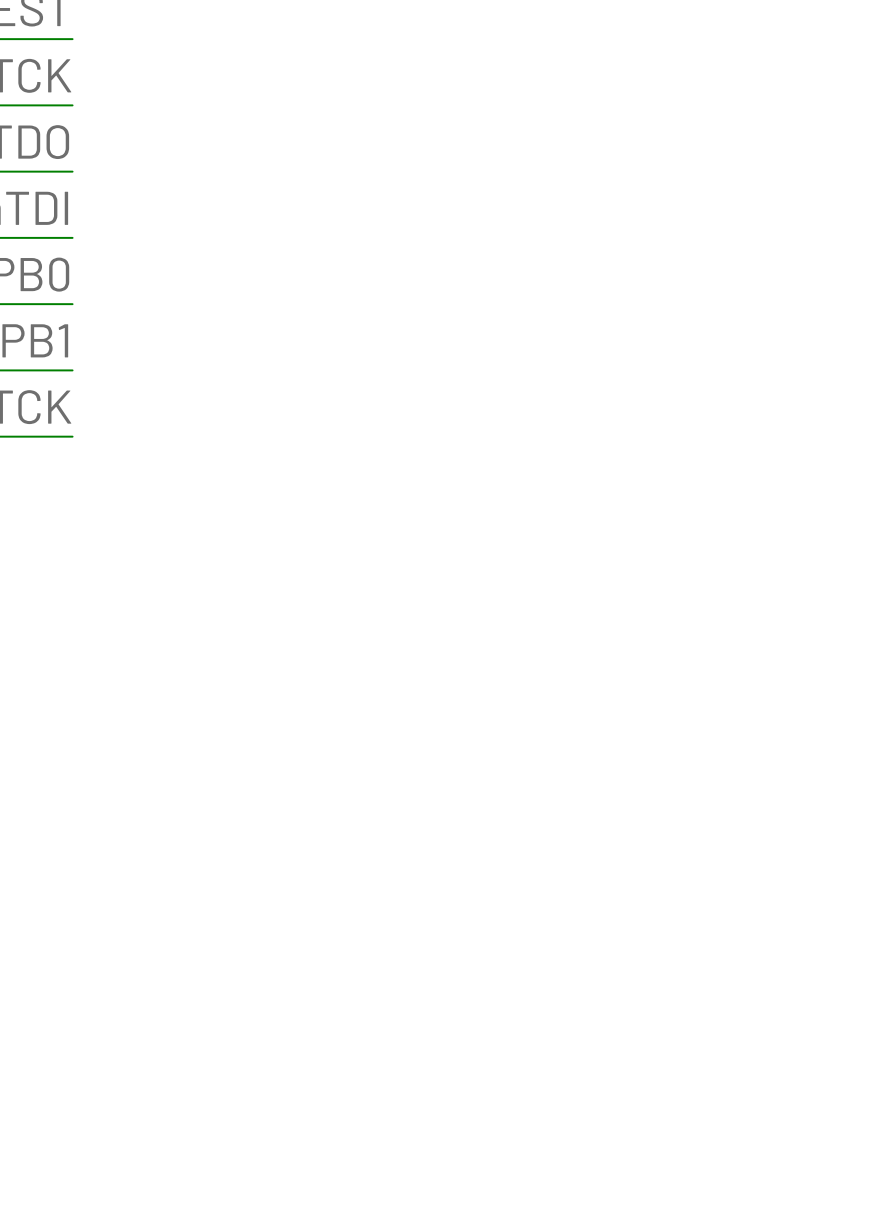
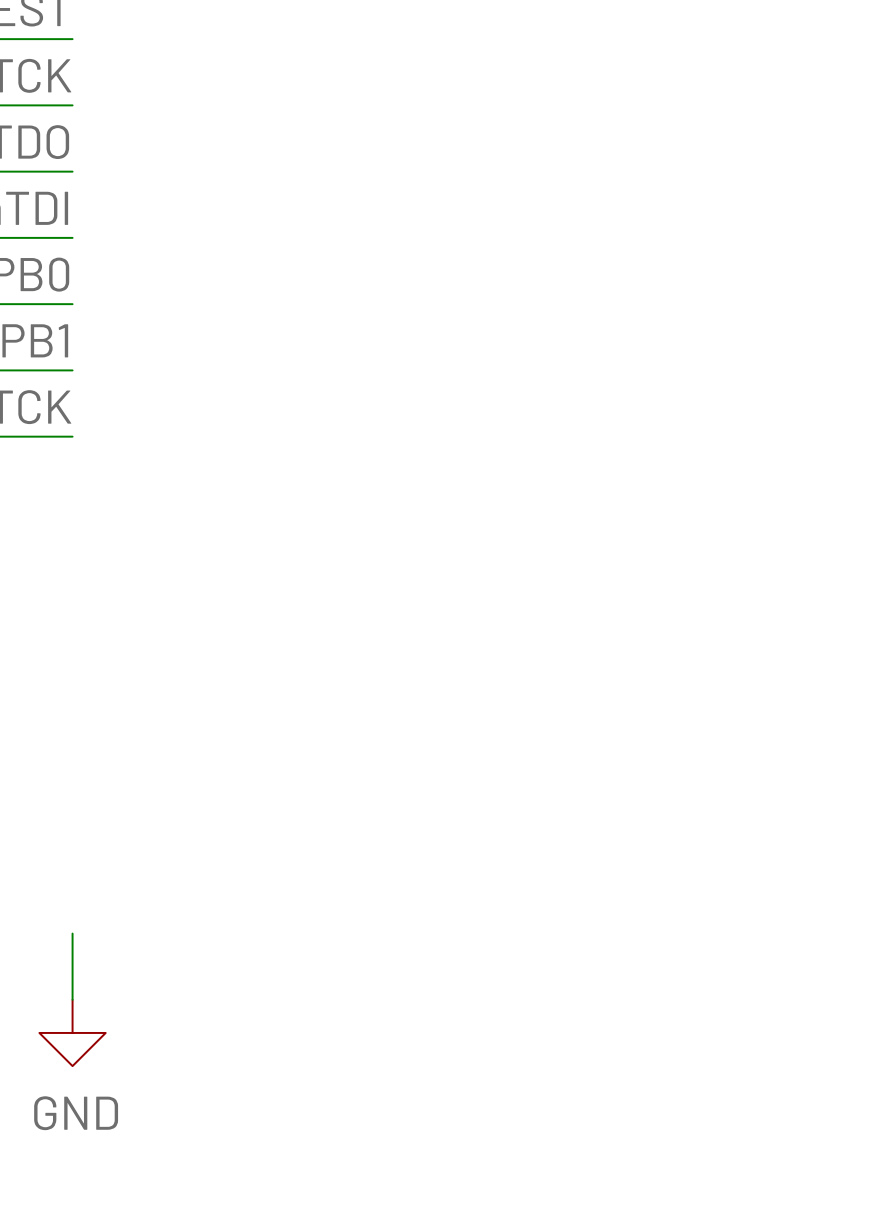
wire: none -> (72, 933) (72, 999)
power symbol: none -> GND (72, 1032)

